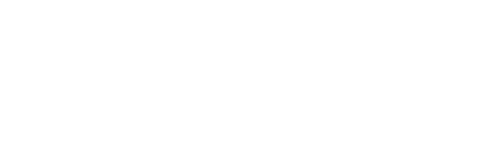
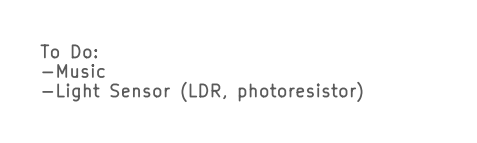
text: none -> To Do: (68, 51)
text: none -> -Music (73, 70)
text: none -> -Light Sensor (LDR, photoresistor) (202, 91)

